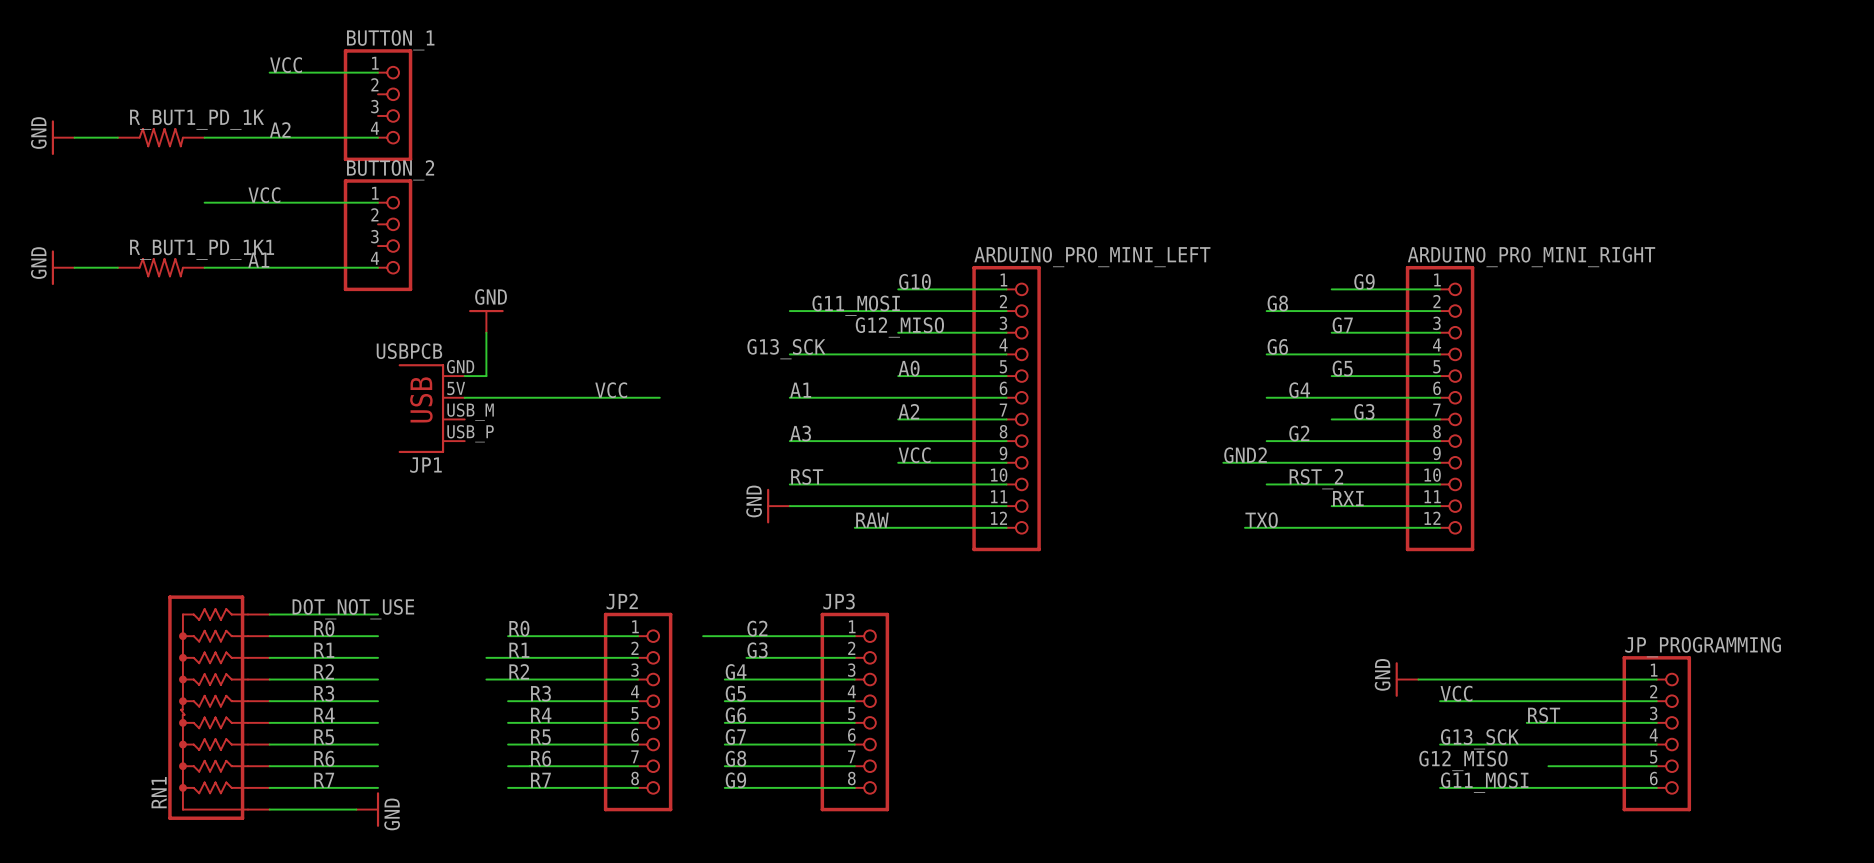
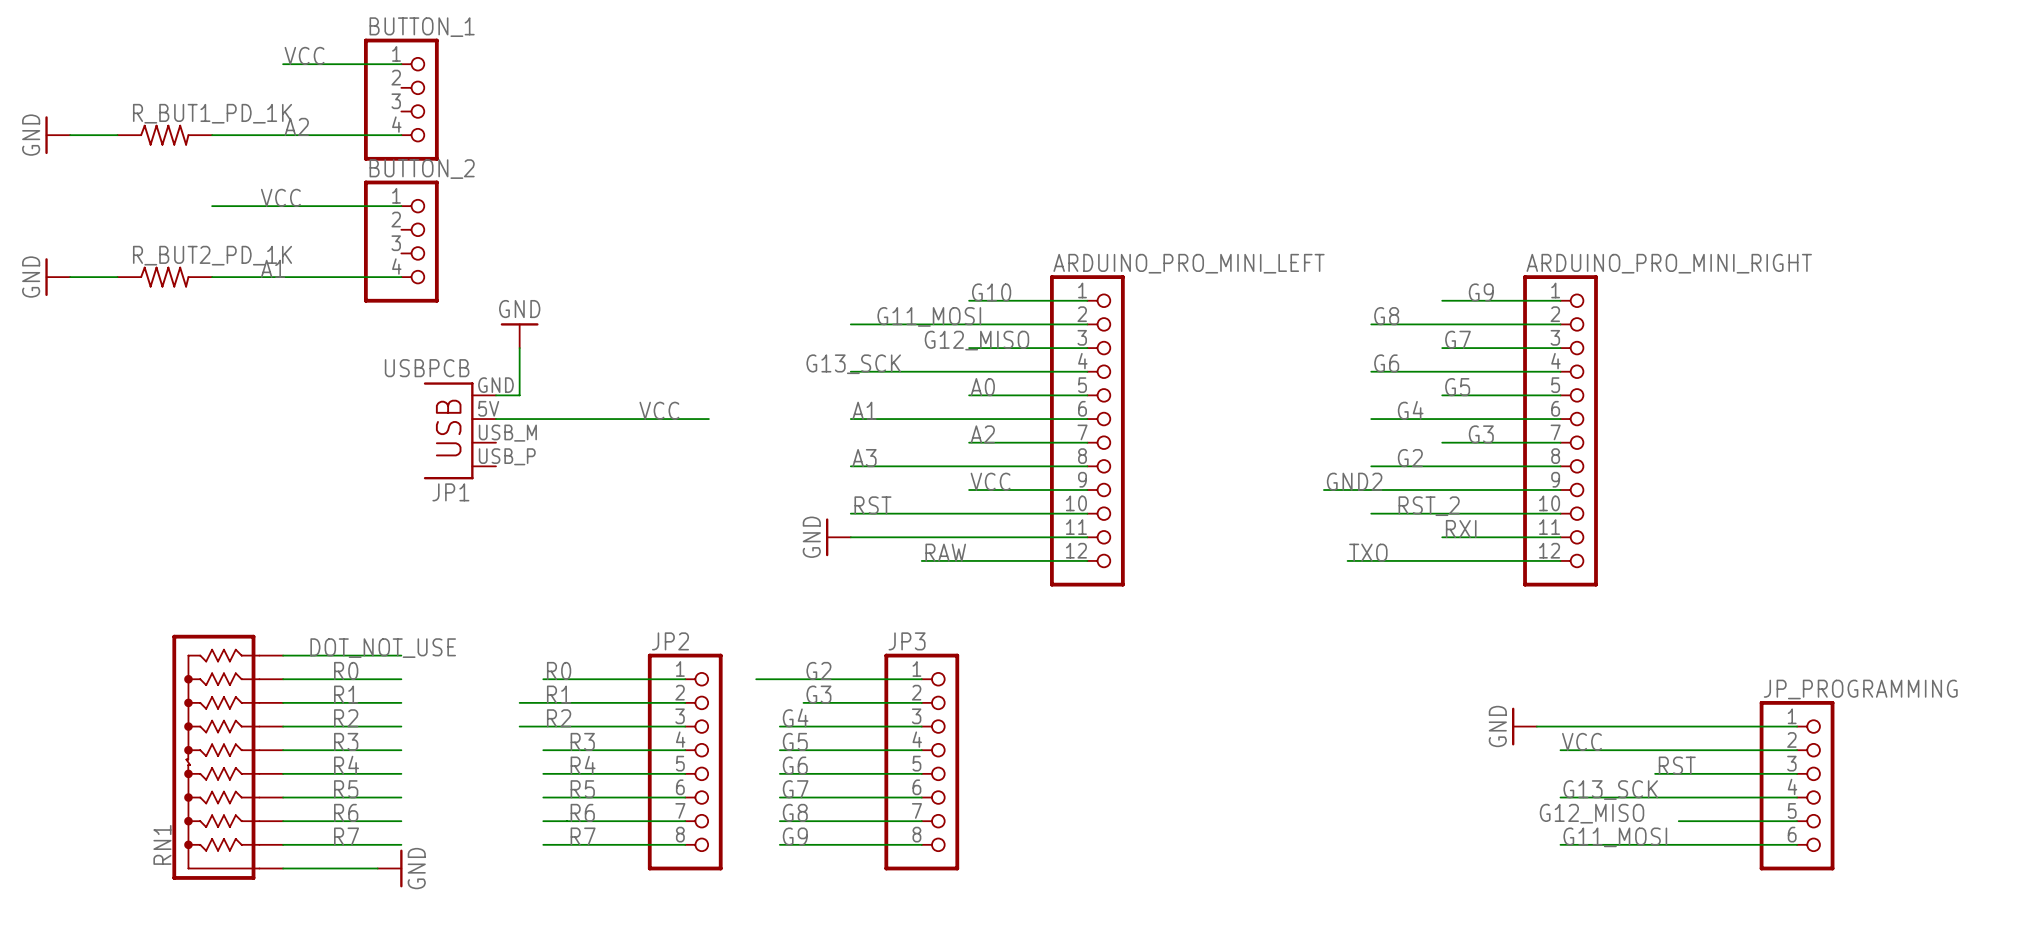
R_BUT1_PD_1K1 name: R_BUT1_PD_1K1 (202, 249) -> R_BUT2_PD_1K (212, 255)

